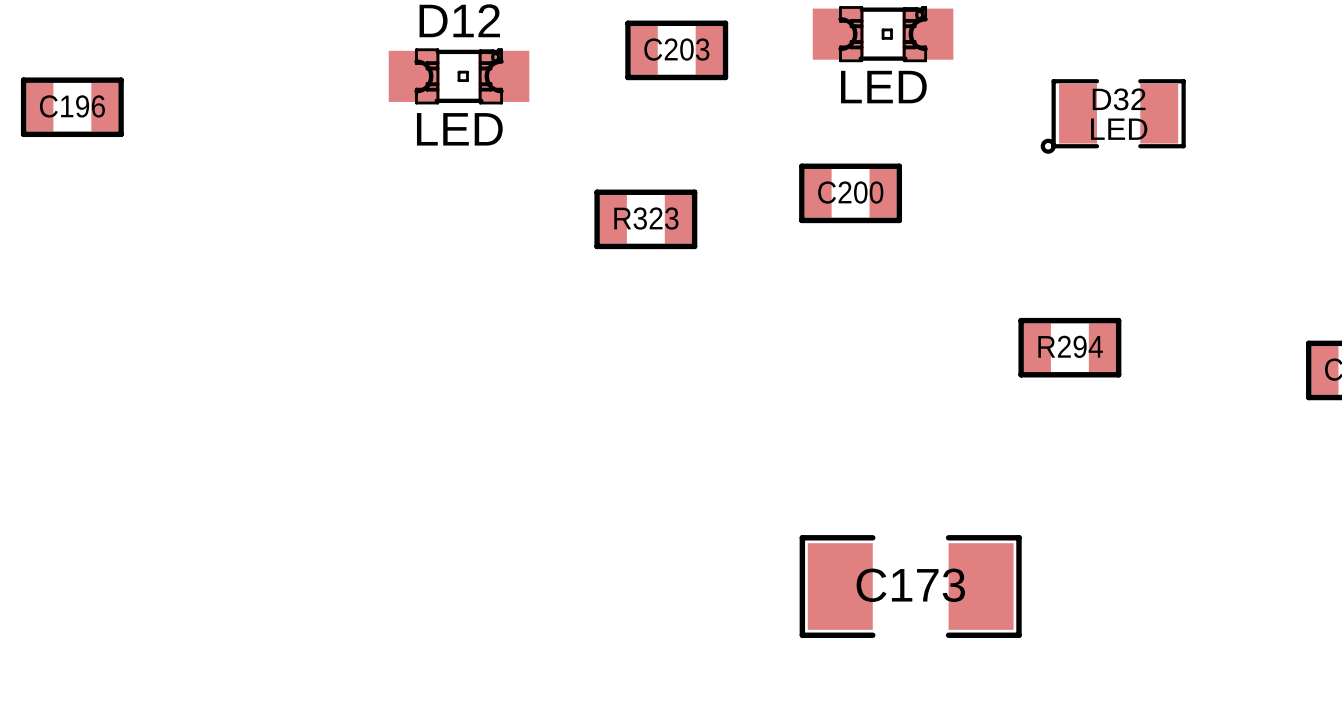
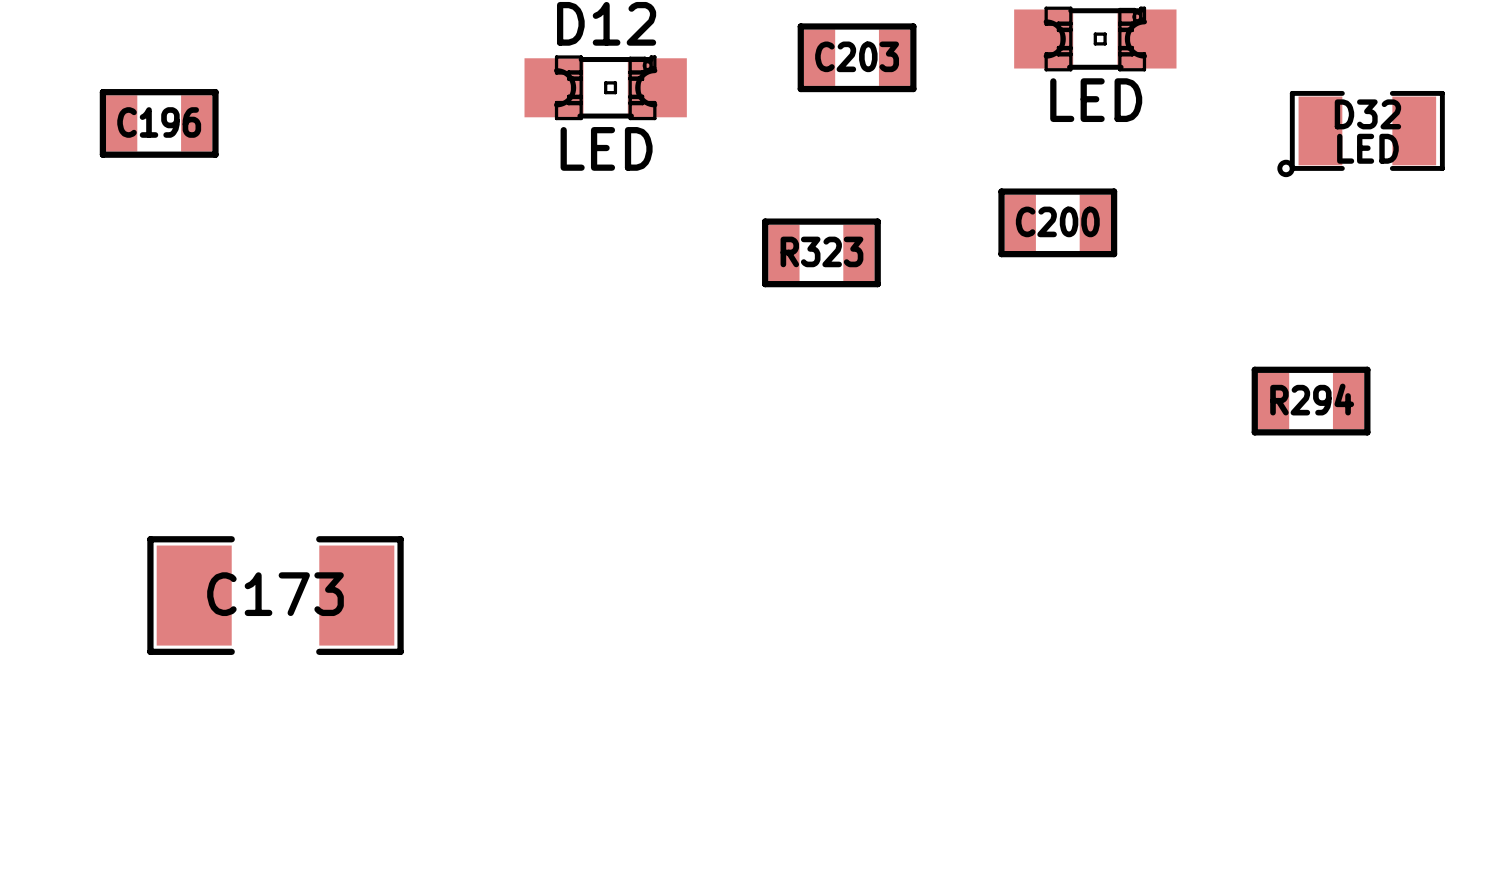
C173 position: (910, 586) -> (275, 595)

